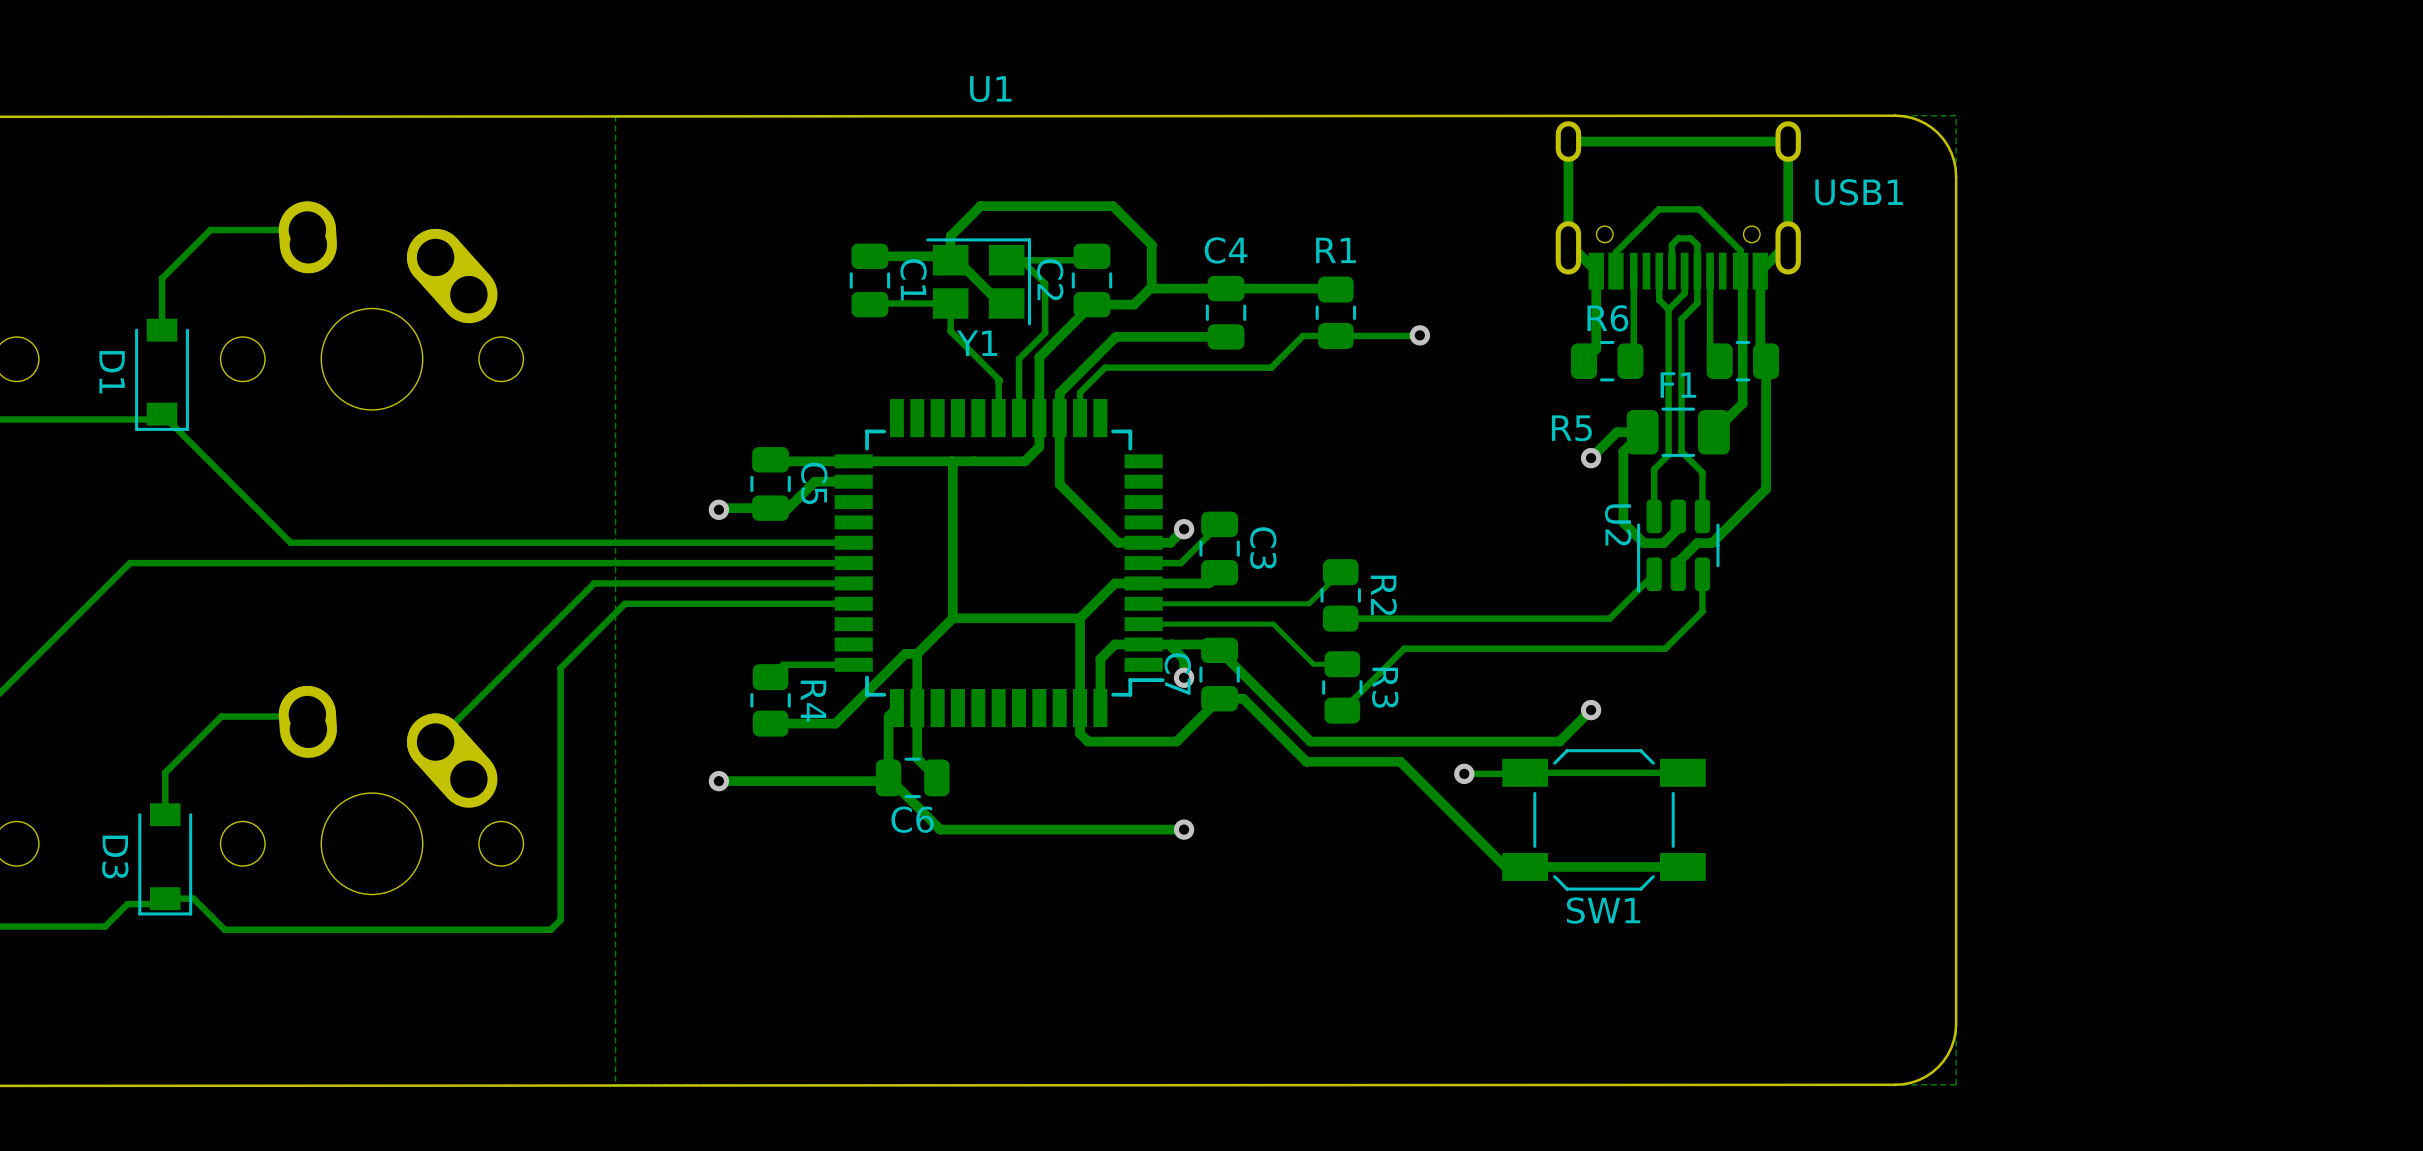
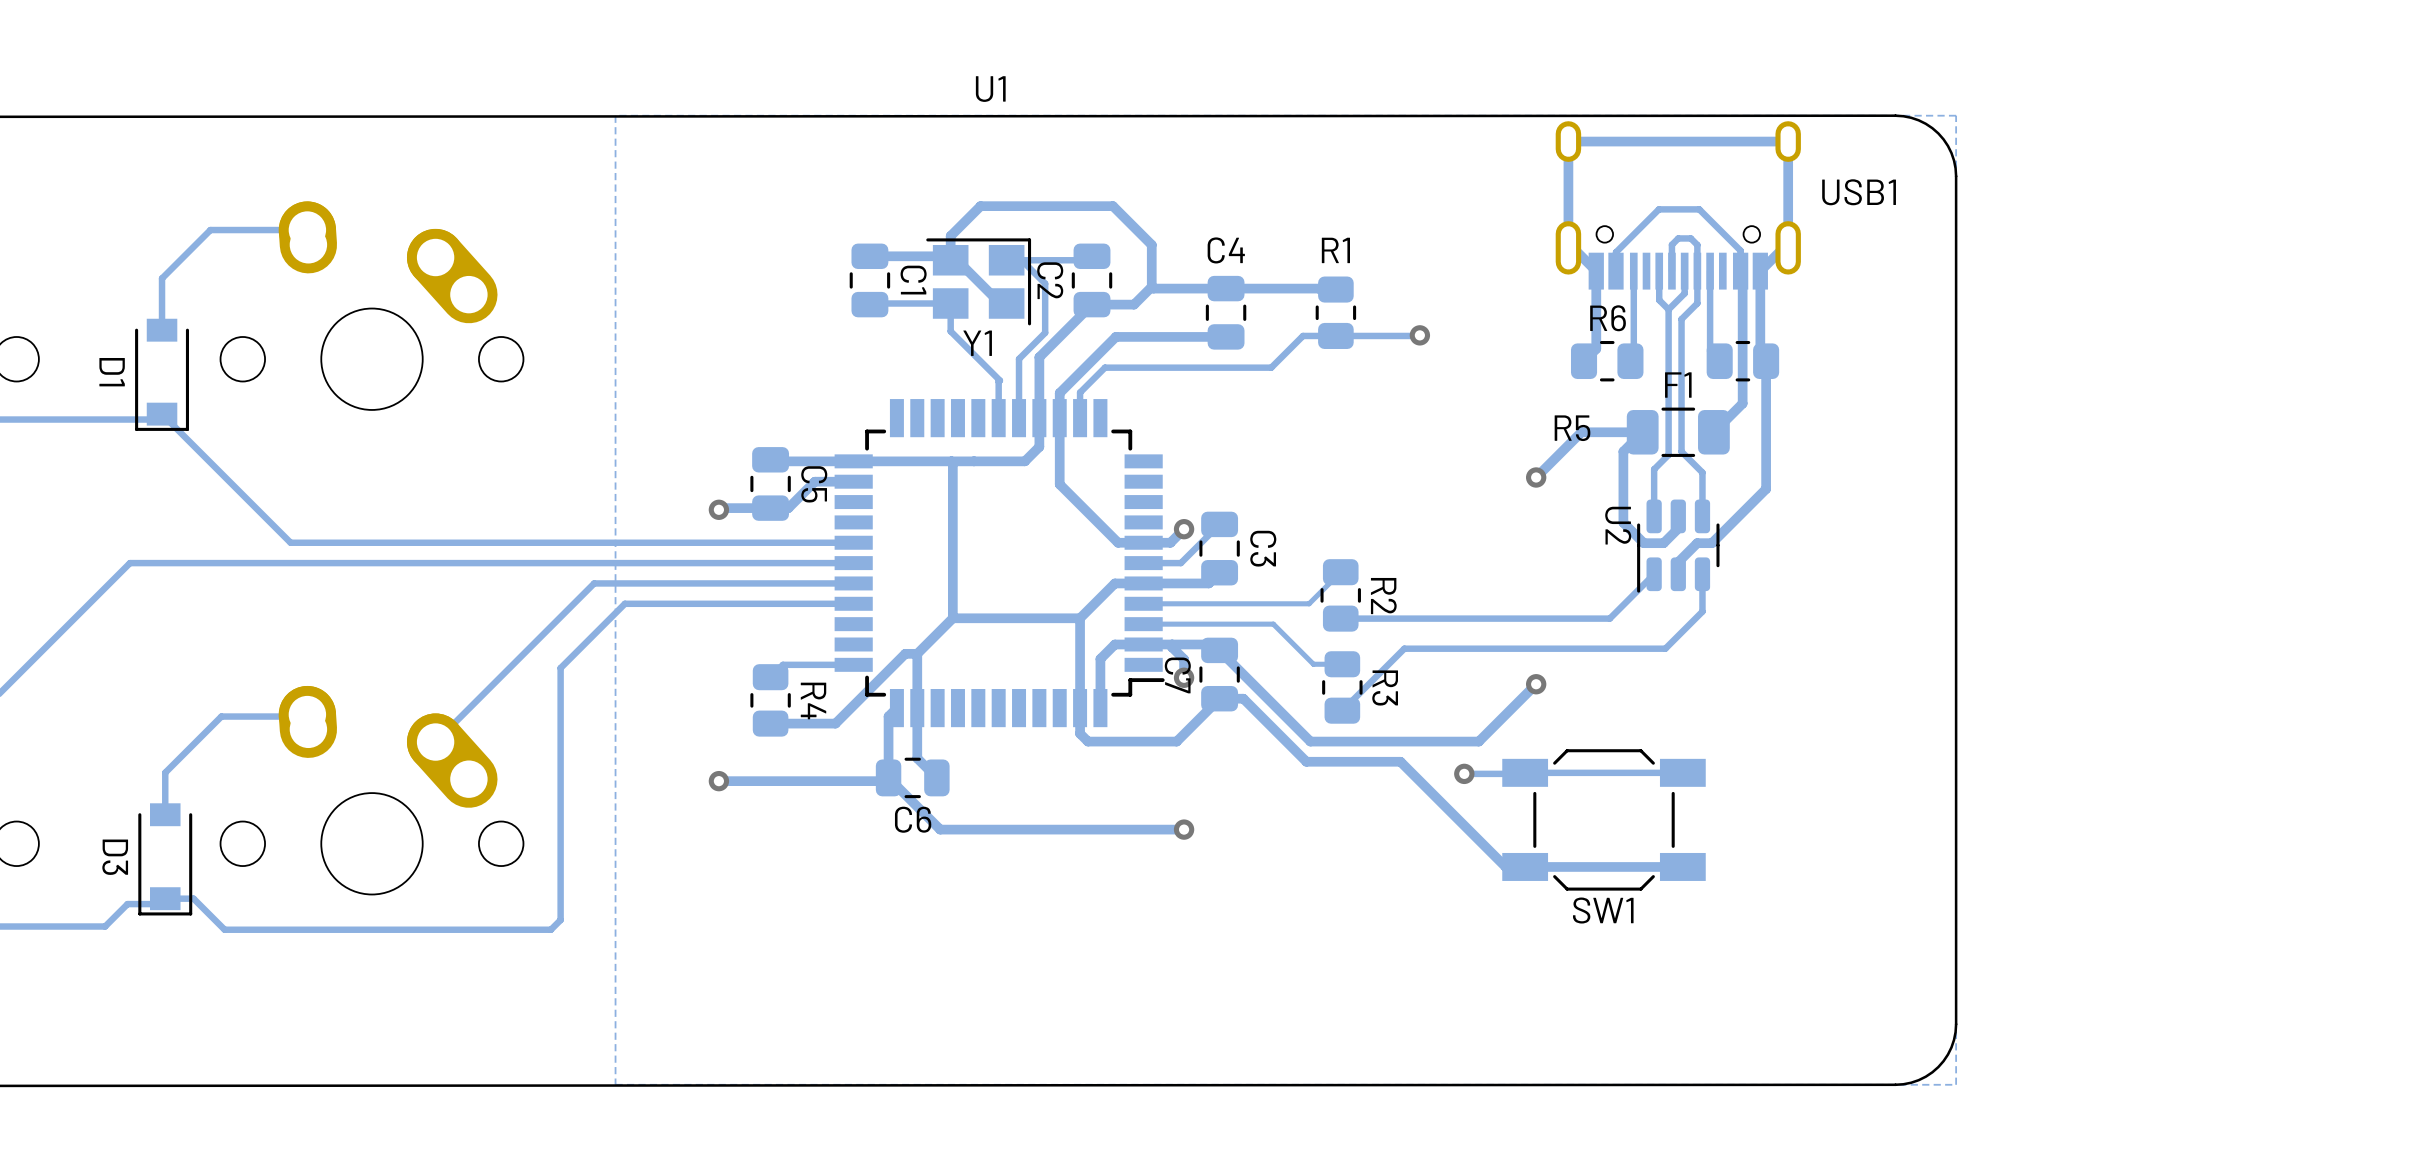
track: (1616, 432) (1591, 458) -> (1616, 432) (1581, 432) (1536, 477)
via position: (1591, 458) -> (1536, 477)
track: (1591, 710) (1559, 741) (1478, 741) -> (1536, 684) (1478, 741)
via position: (1591, 710) -> (1536, 684)

